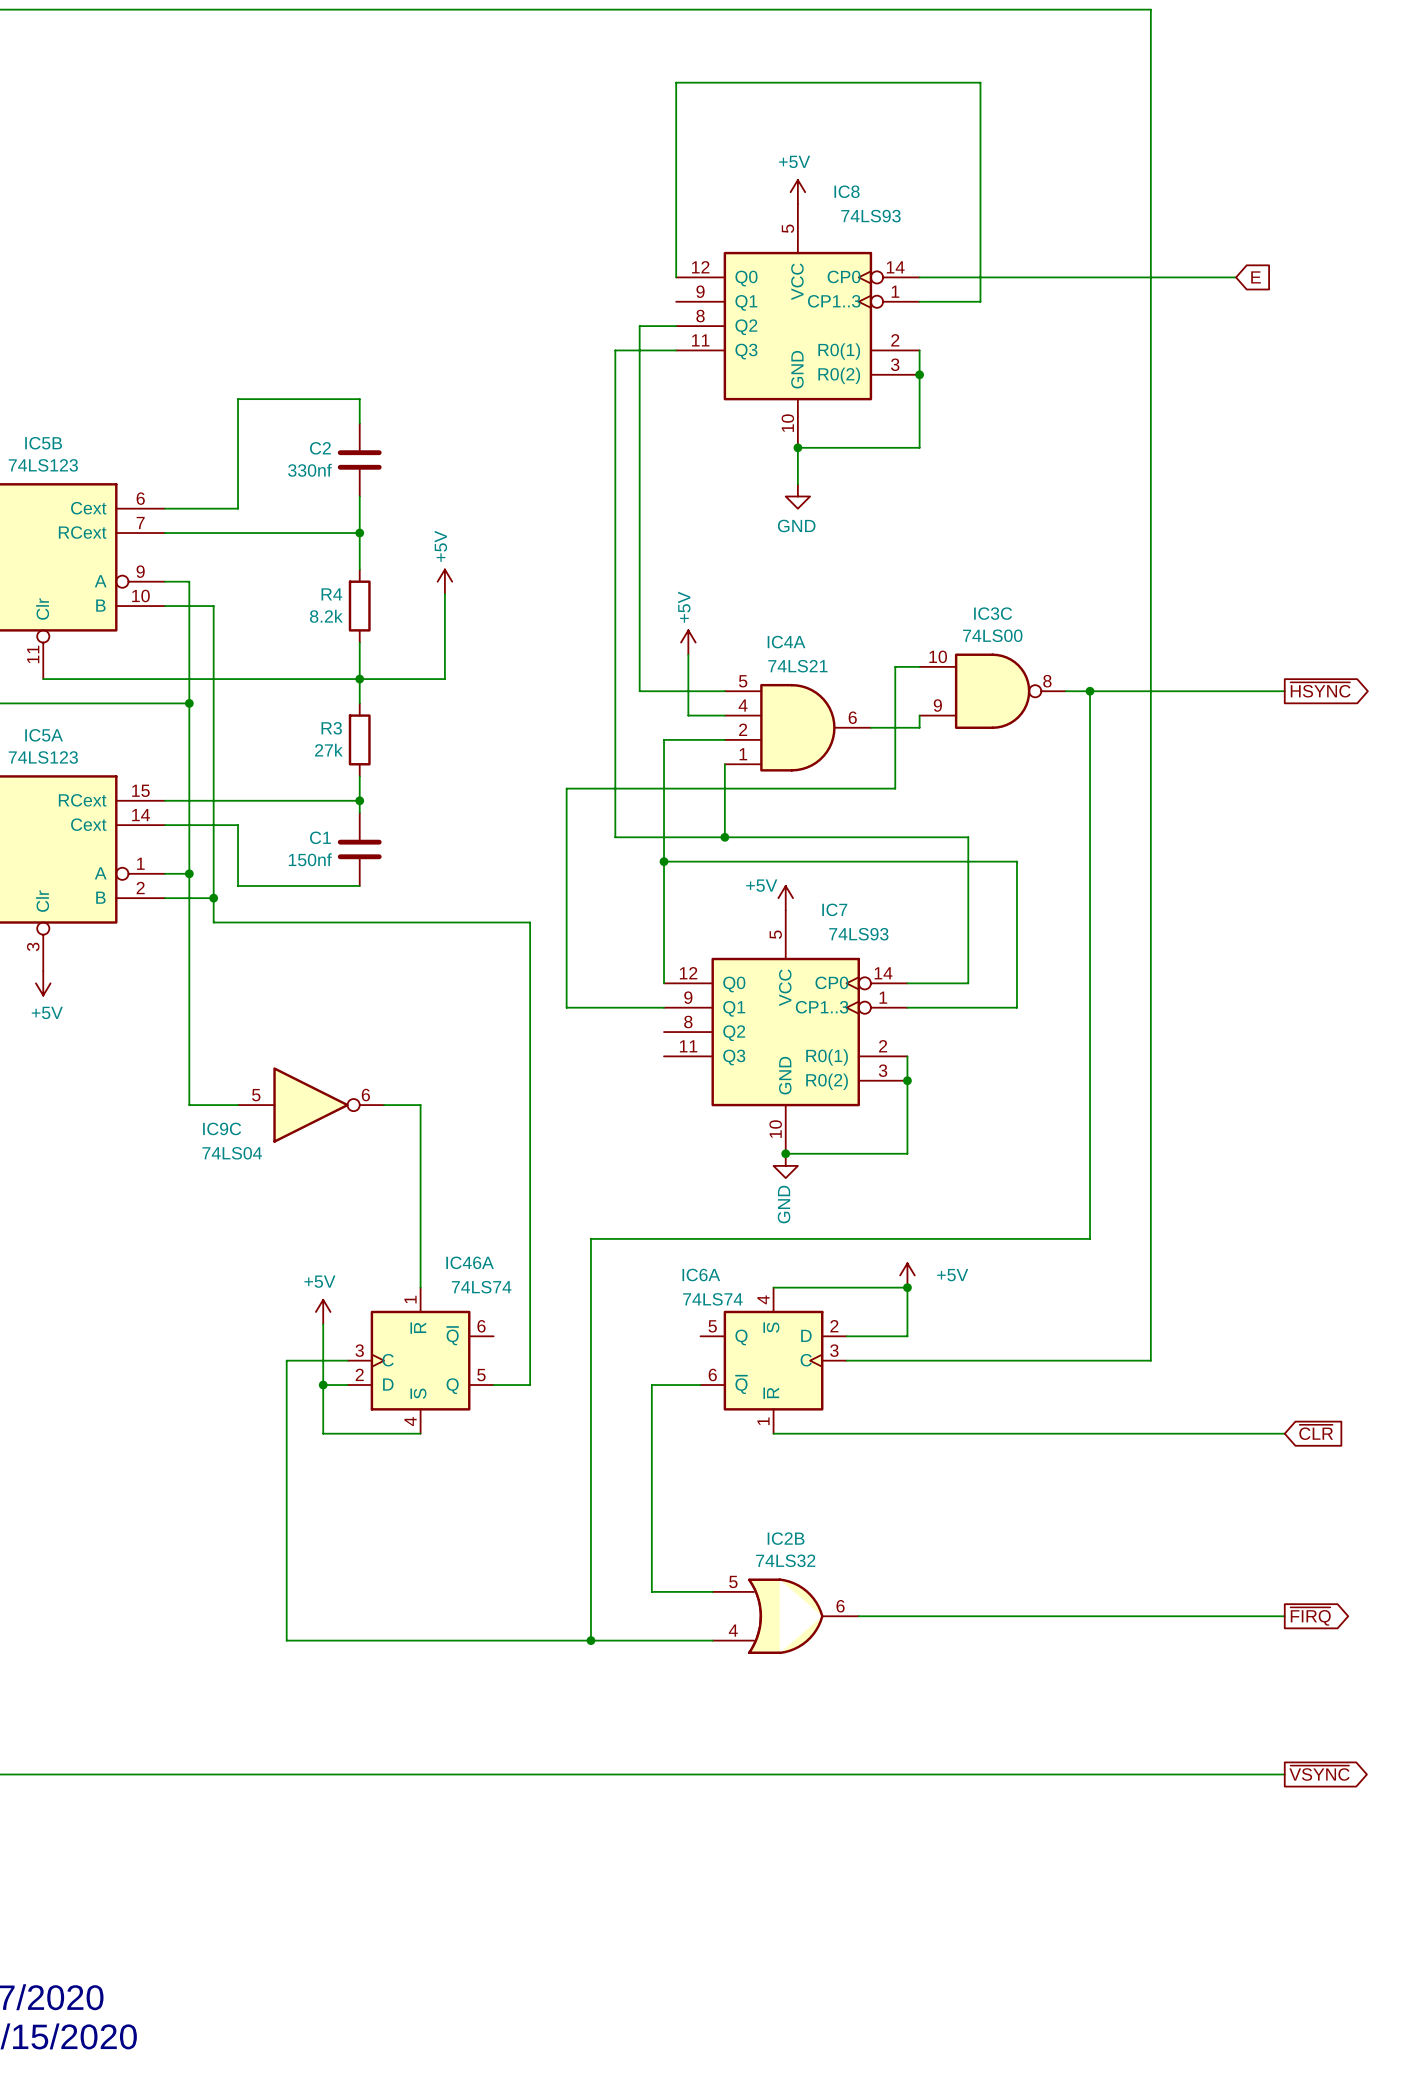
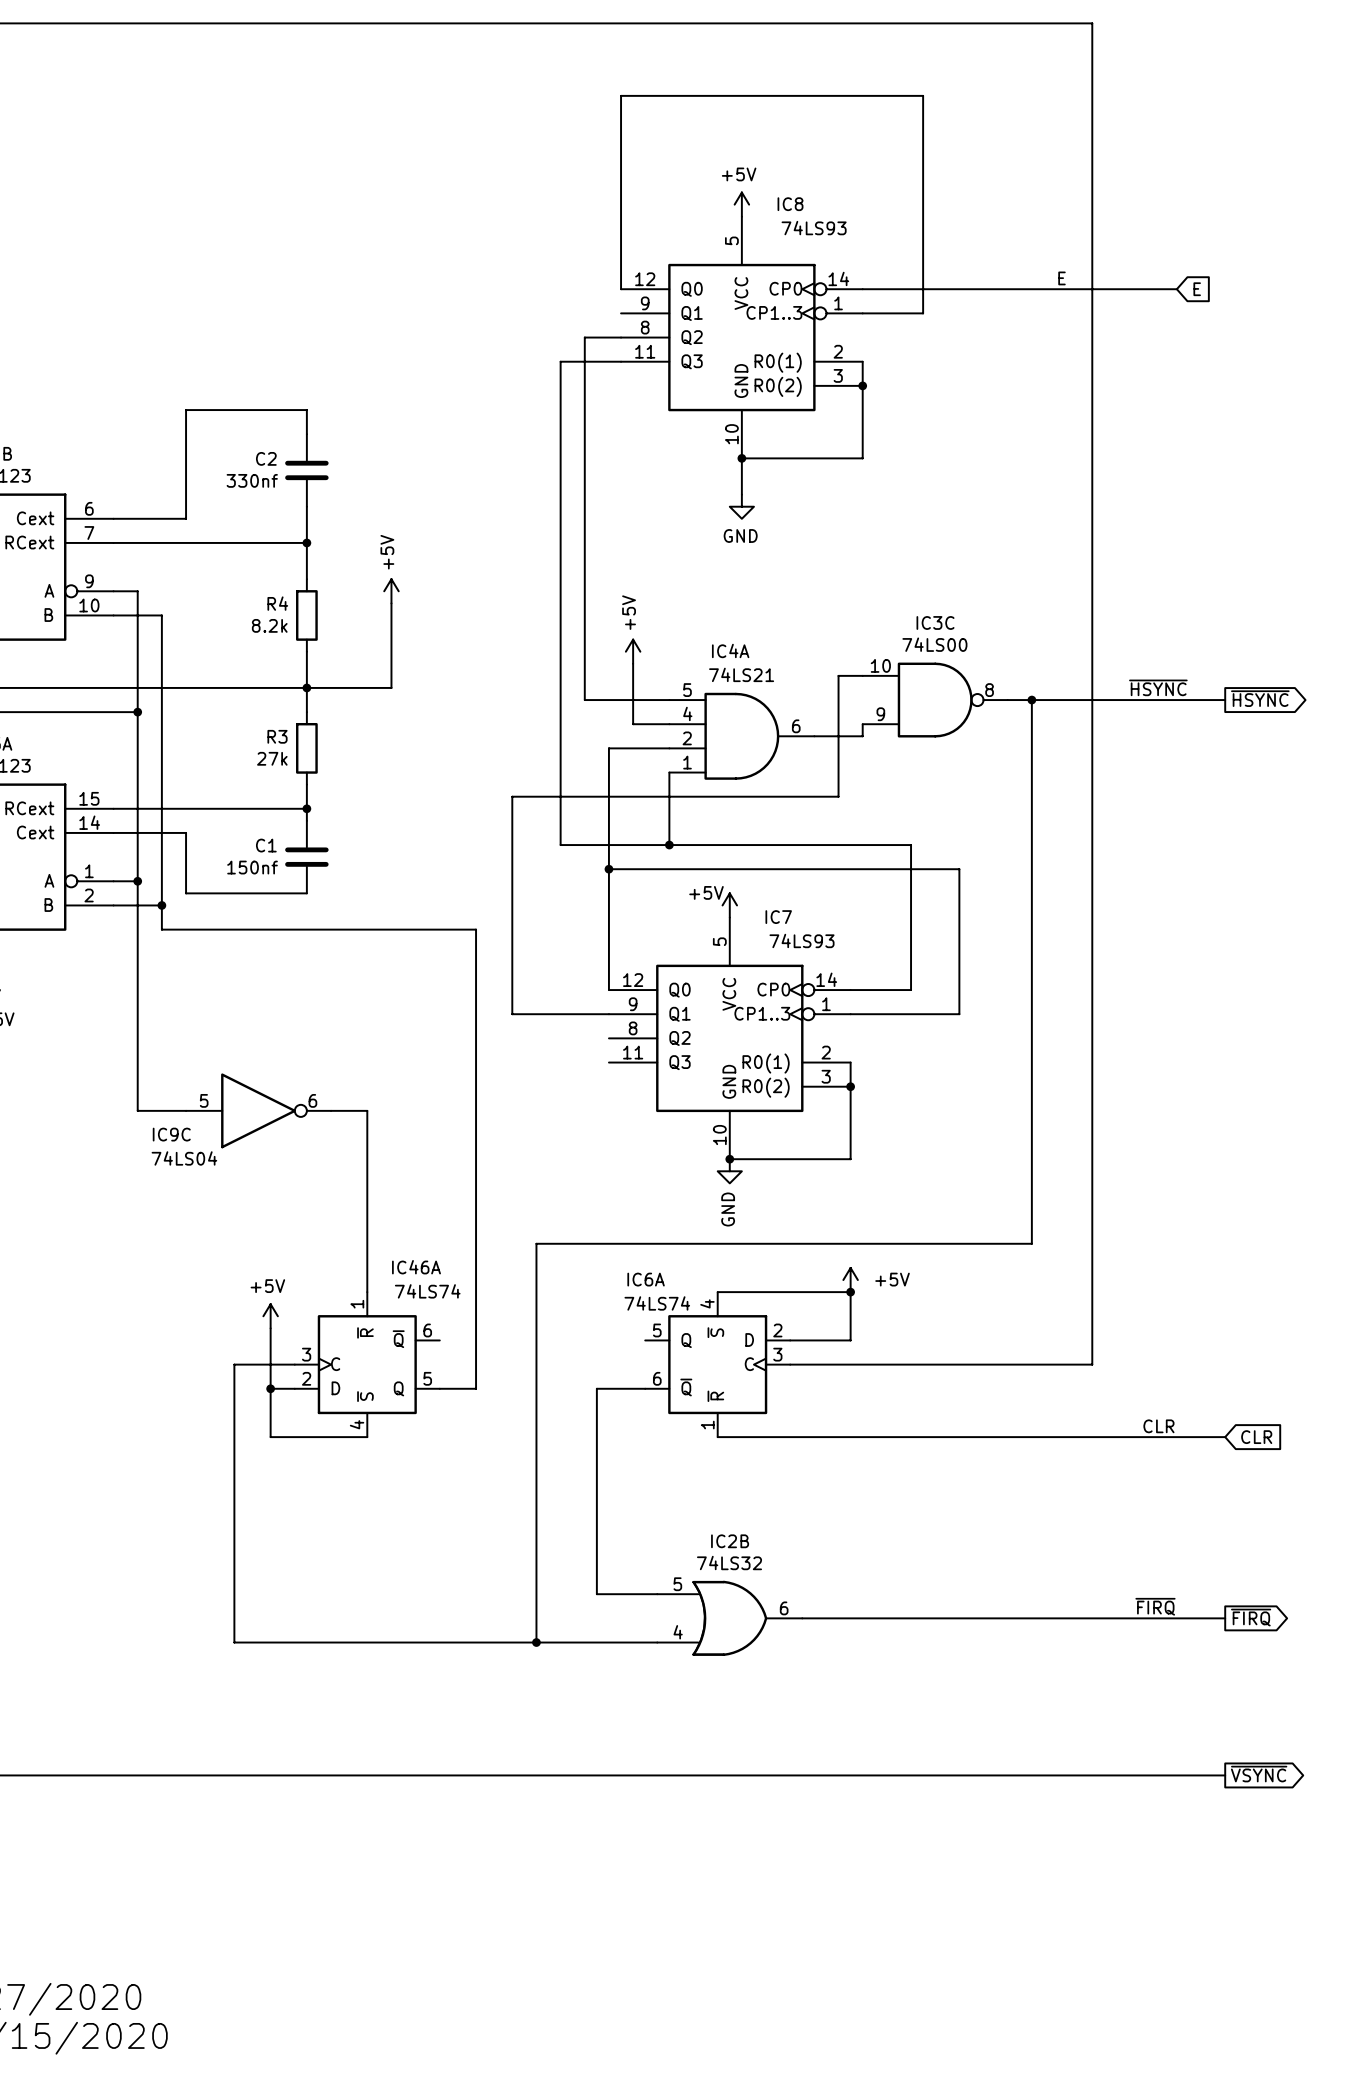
label: none -> E (1061, 278)
label: none -> ~{HSYNC} (1158, 687)
label: none -> CLR (1158, 1426)
global label: ~{CLR} (1316, 1432) -> CLR (1256, 1437)
label: none -> ~{FIRQ} (1155, 1606)

